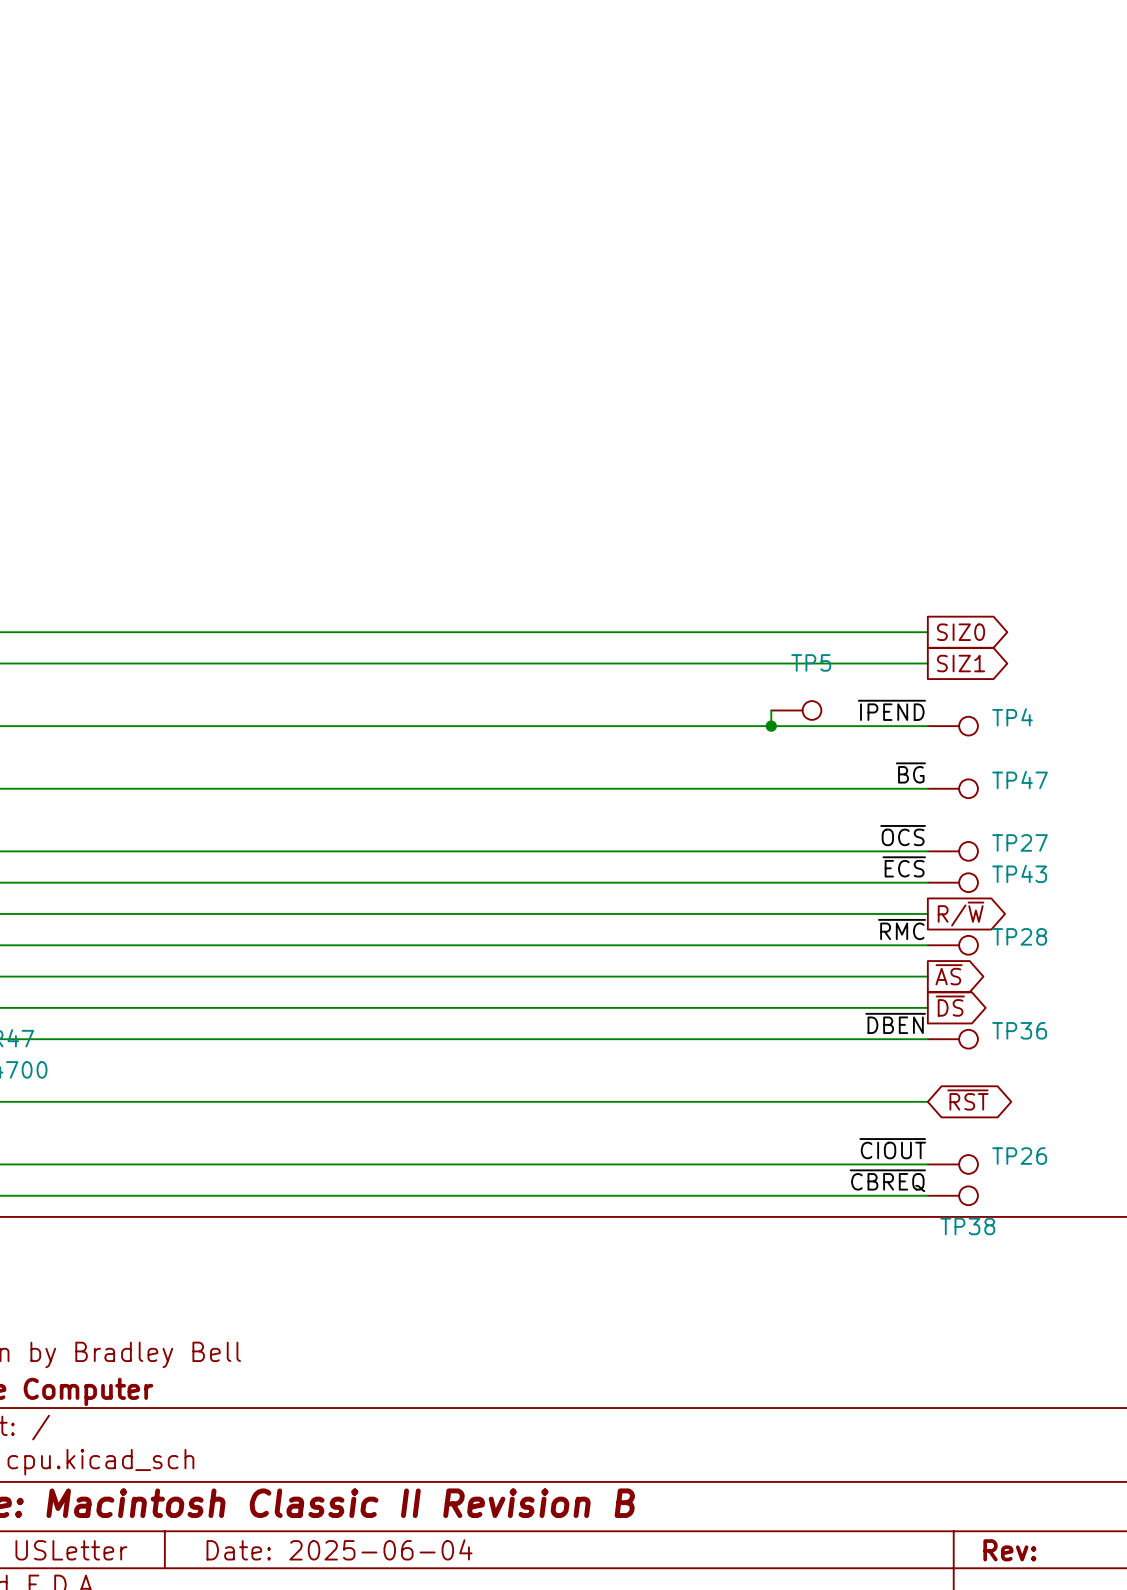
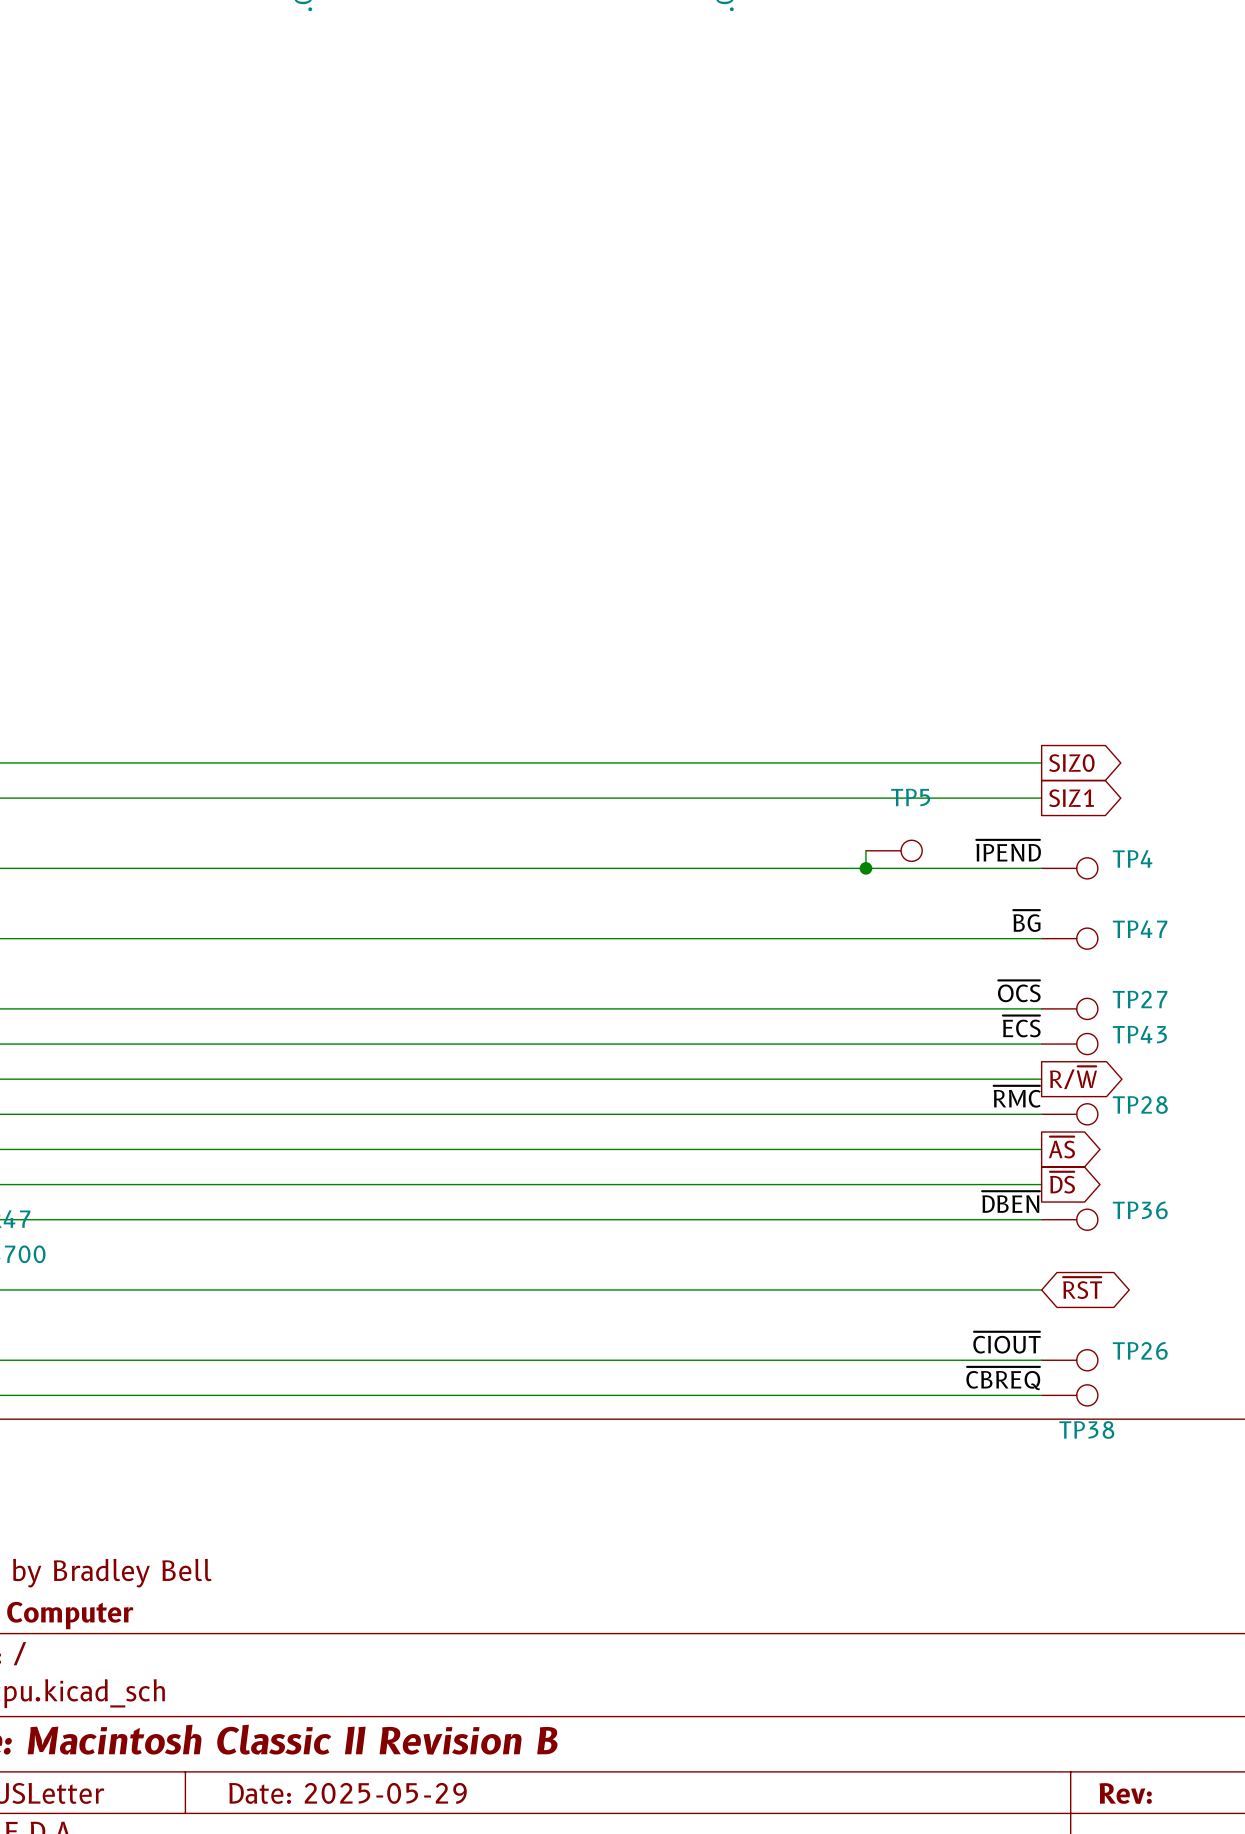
title block: Date: 2025-06-04 (339, 1549) -> Date: 2025-05-29 (347, 1793)

